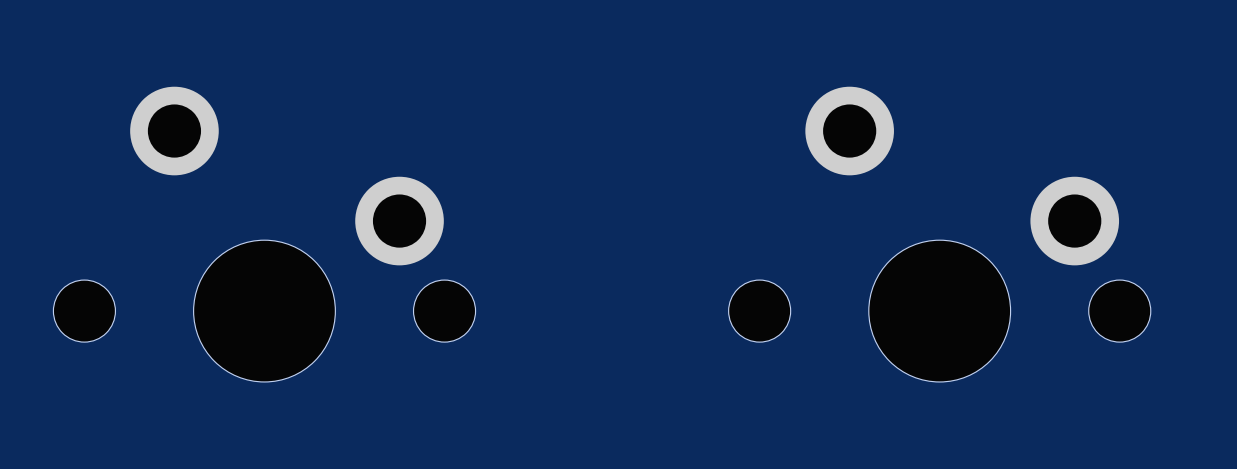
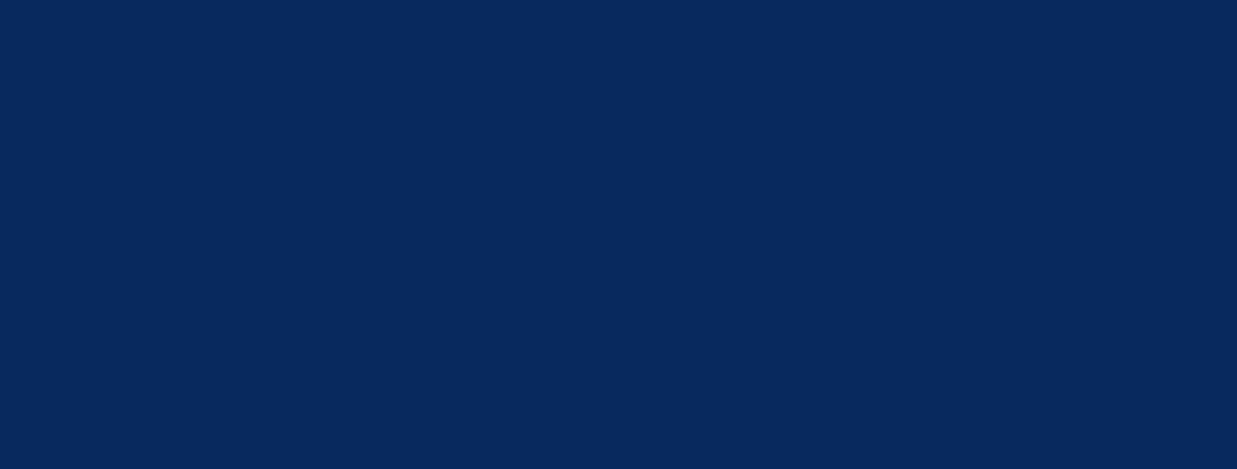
part: (264, 234) -> none
part: (939, 234) -> none

